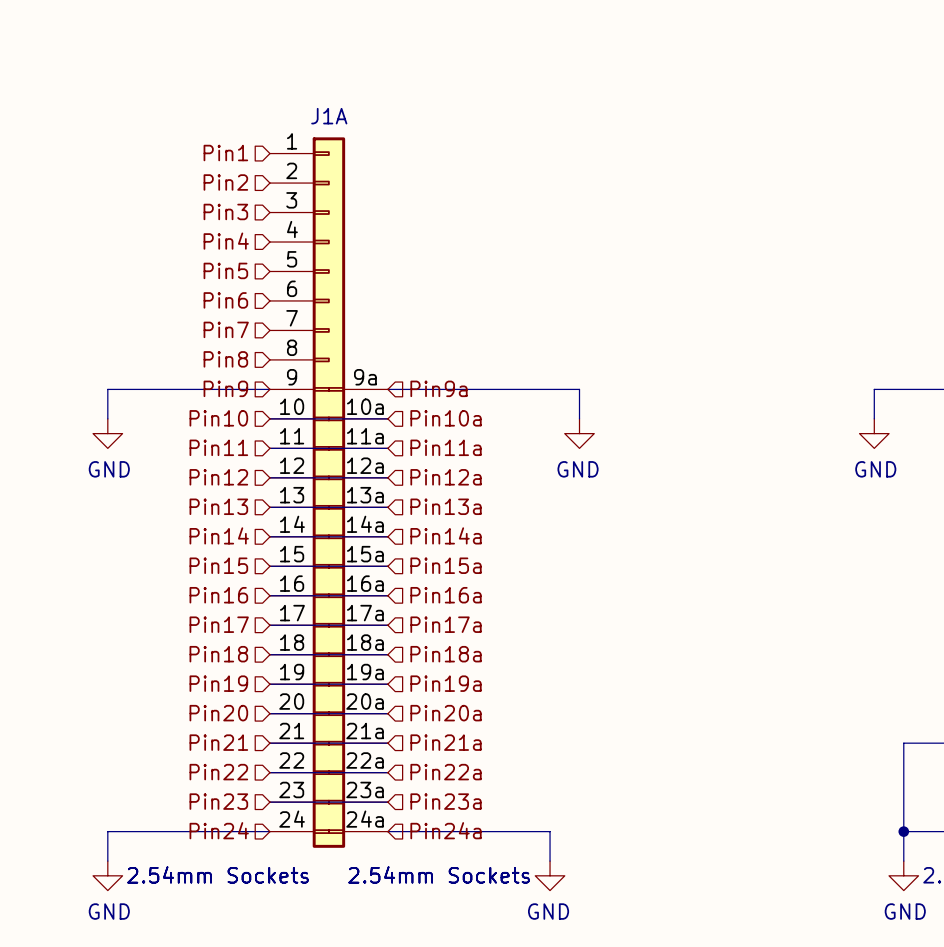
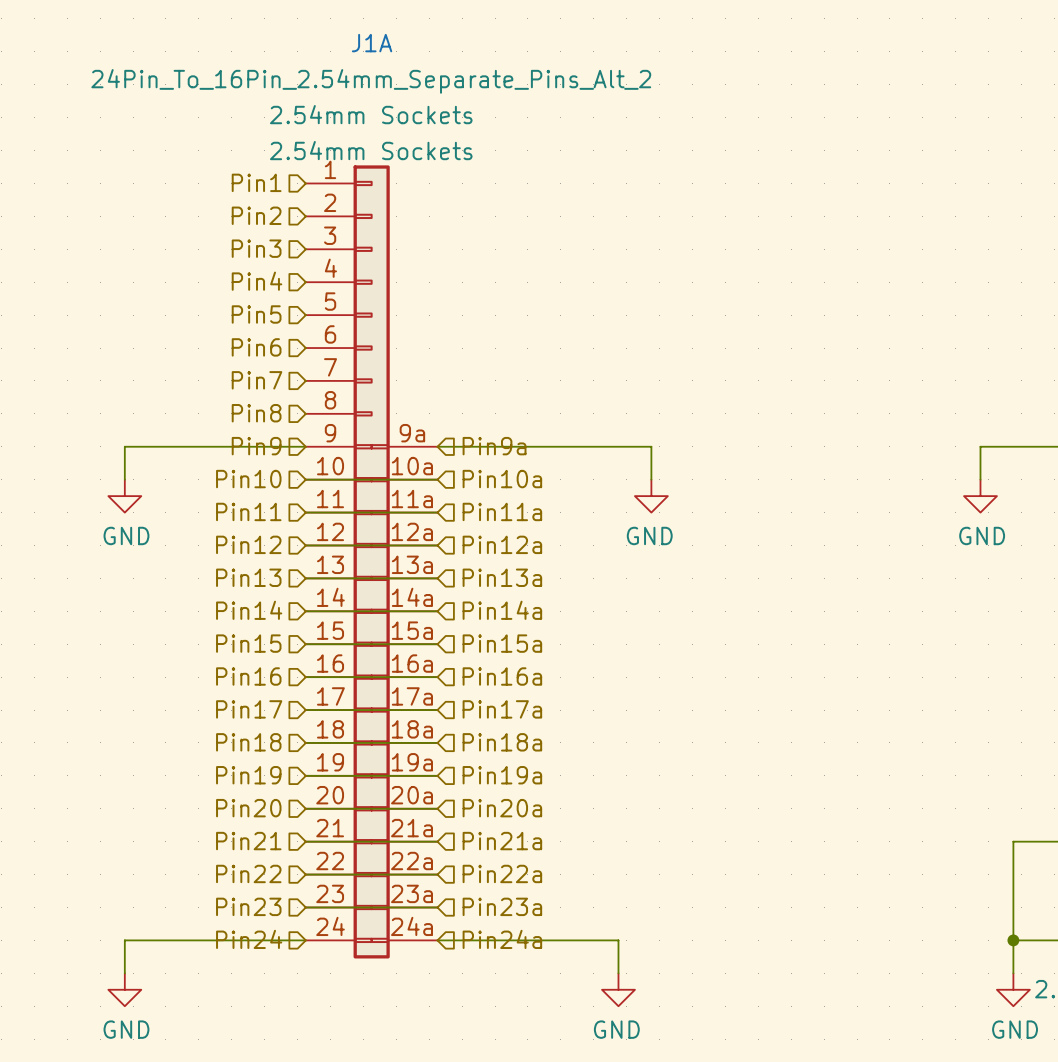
J1A value: none -> 24Pin_To_16Pin_2.54mm_Separate_Pins_Alt_2 (371, 81)
J1A name position: J1A (329, 116) -> J1A (372, 43)
J1A text position: 2.54mm Sockets (218, 874) -> 2.54mm Sockets (371, 114)
J1A text: 2.54mm Sockets (218, 874) -> none
J1A text: 2.54mm Sockets (439, 874) -> none
J1A text position: 2.54mm Sockets (439, 874) -> 2.54mm Sockets (371, 150)

